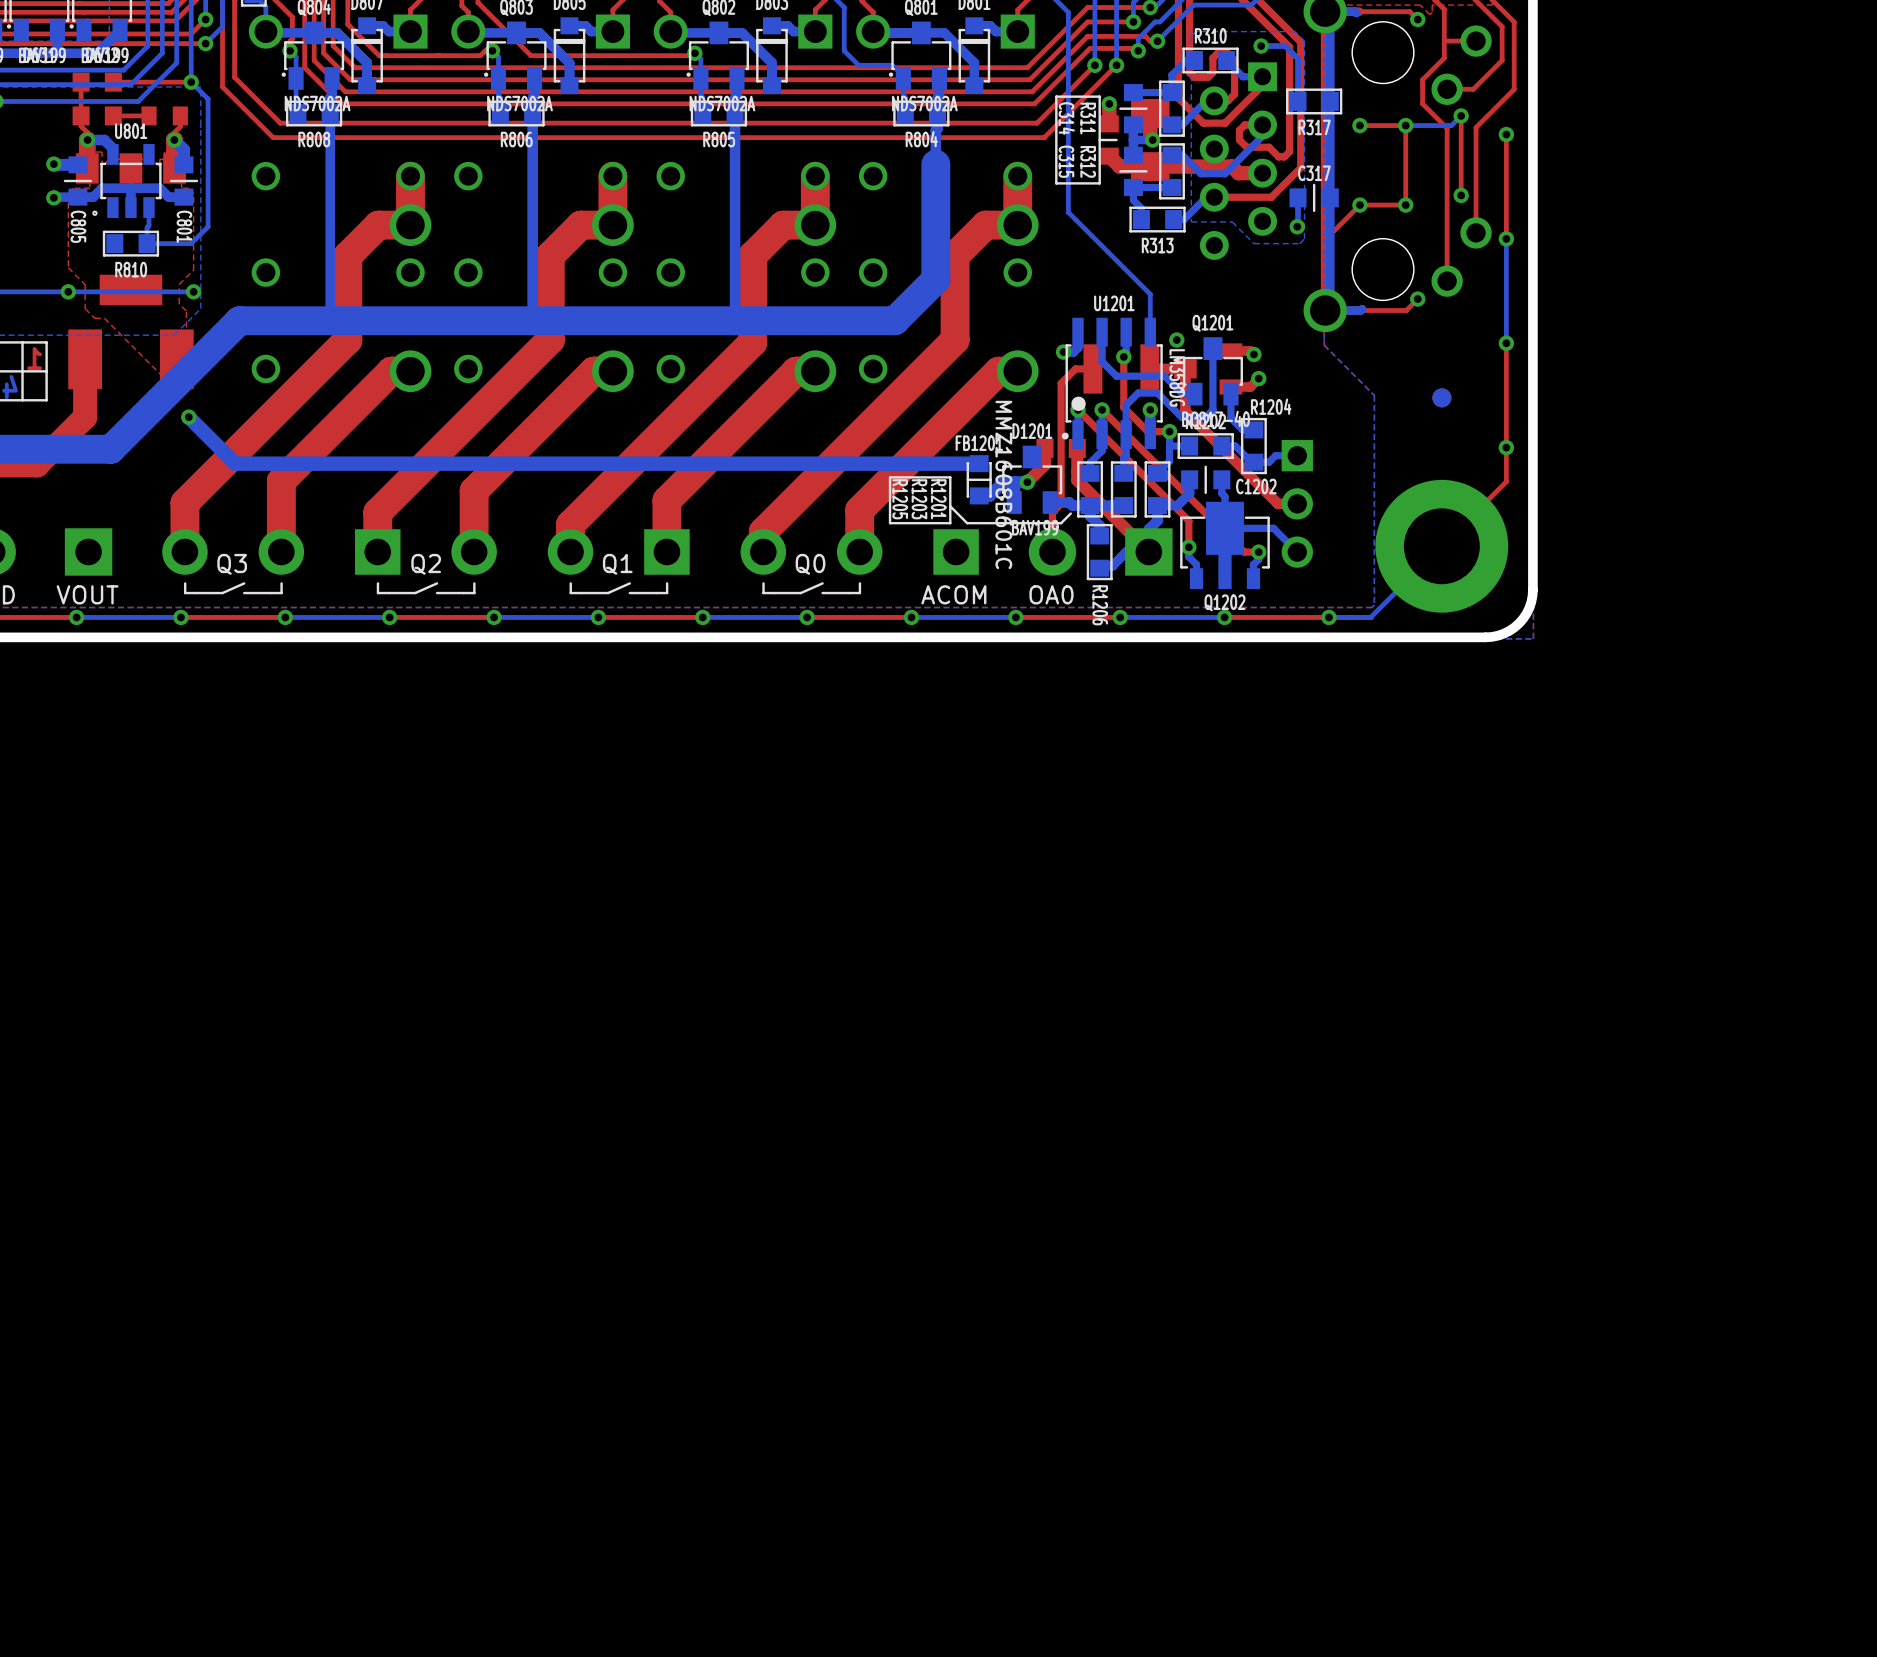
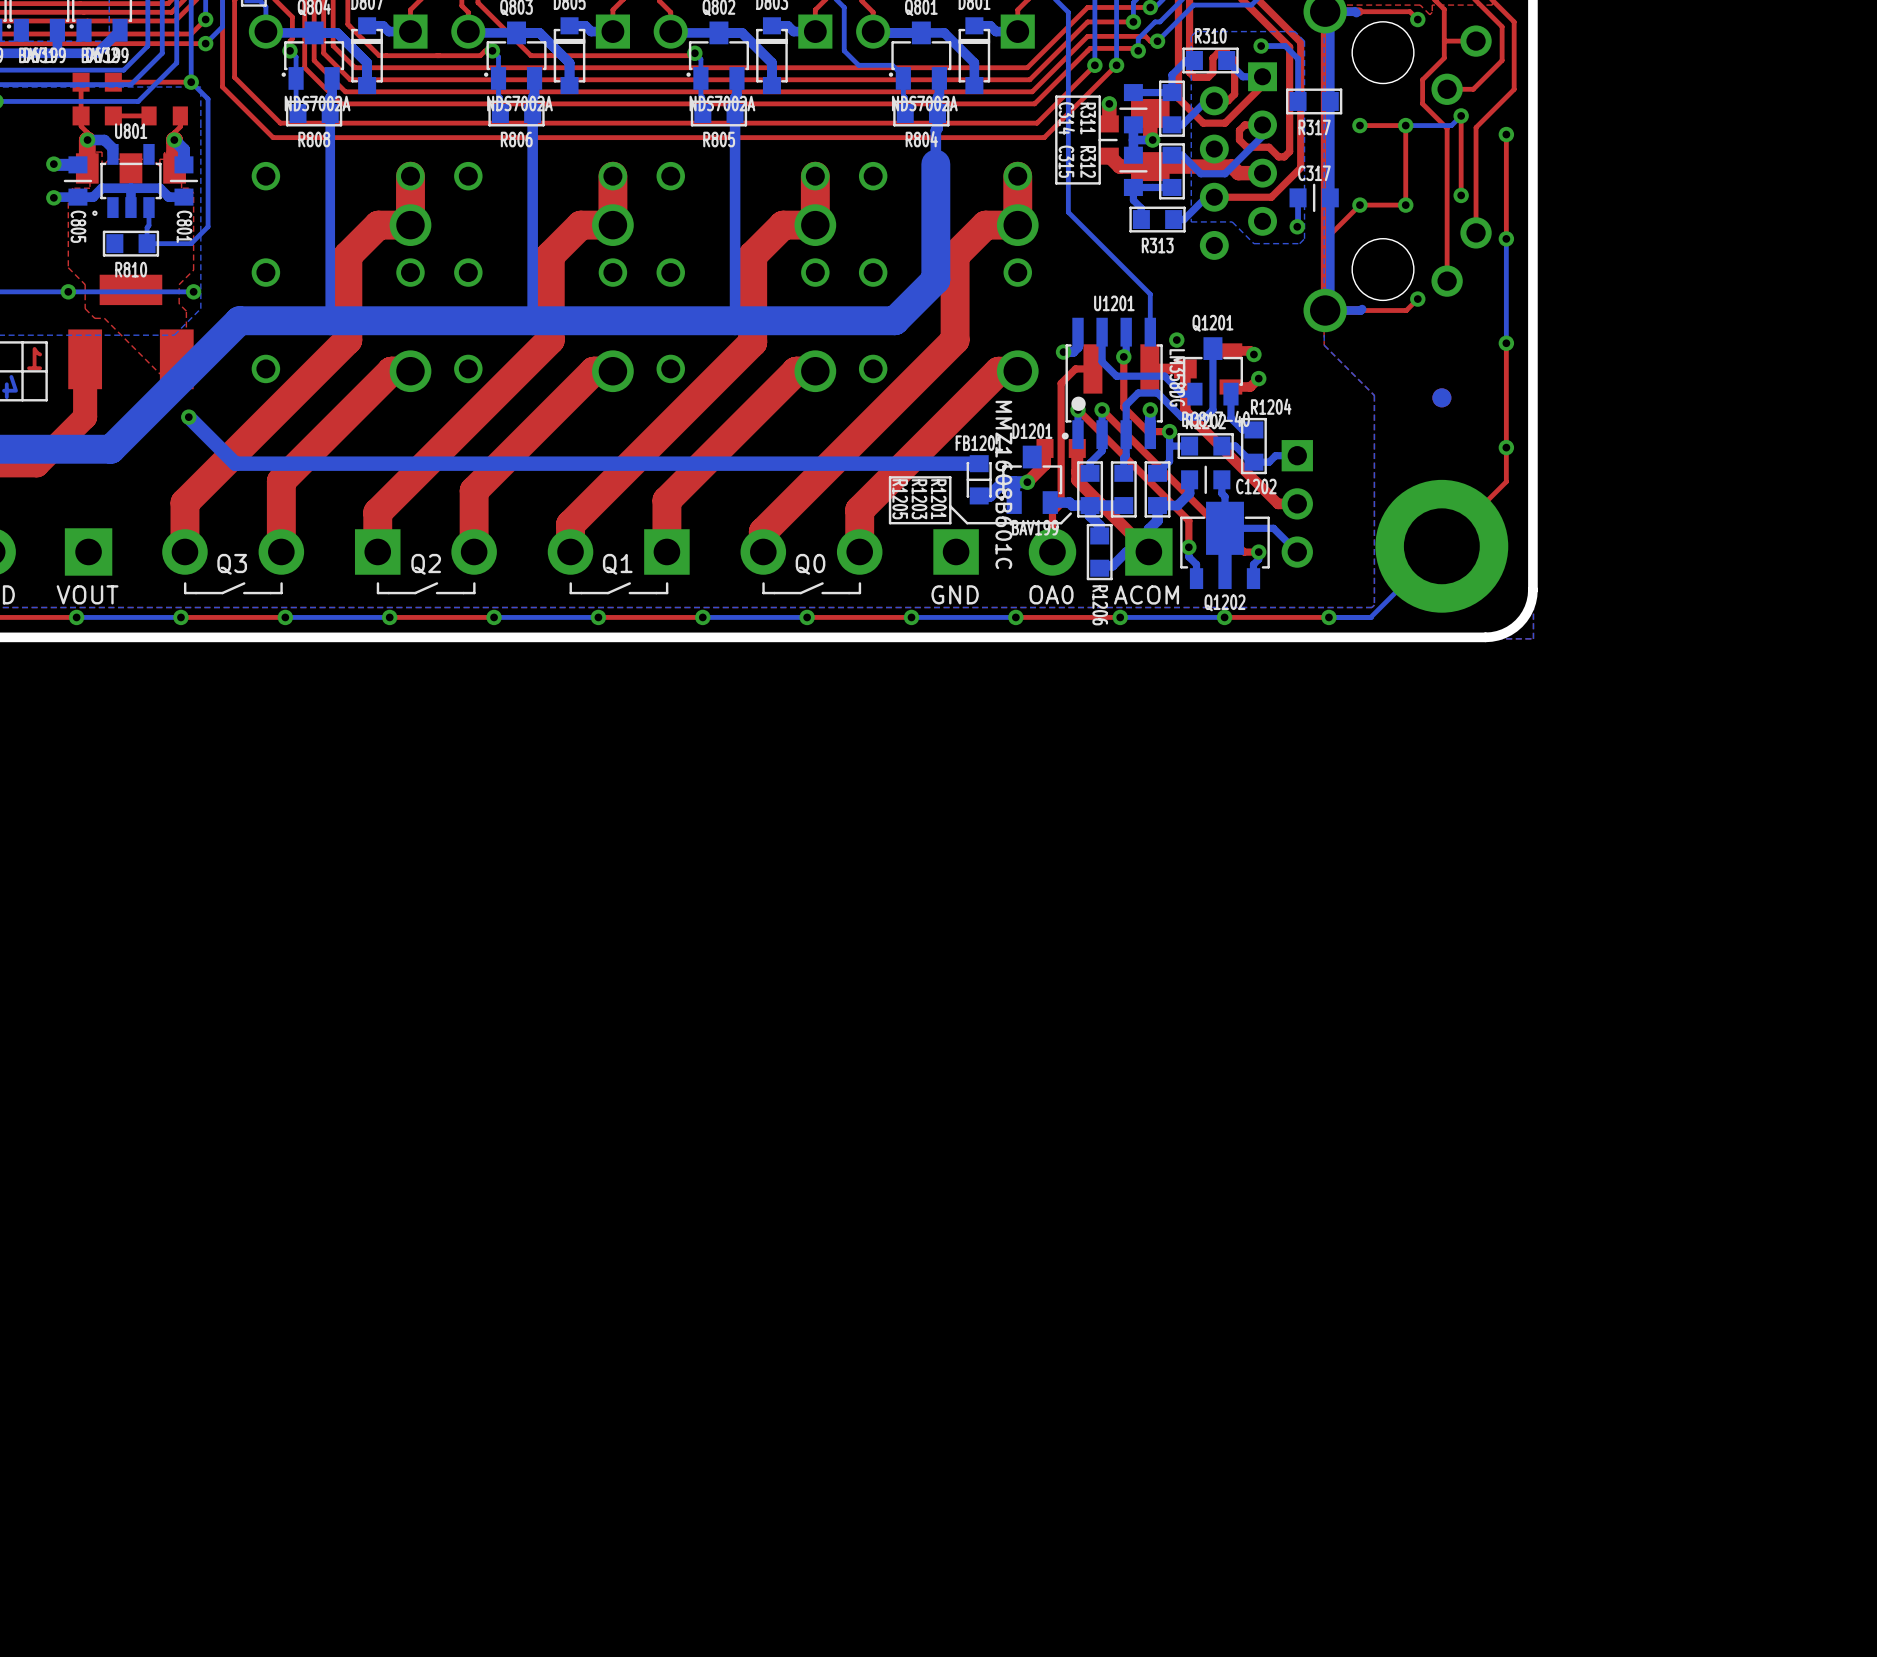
text: ACOM (953, 594) -> GND (955, 594)
text: none -> ACOM (1146, 594)

